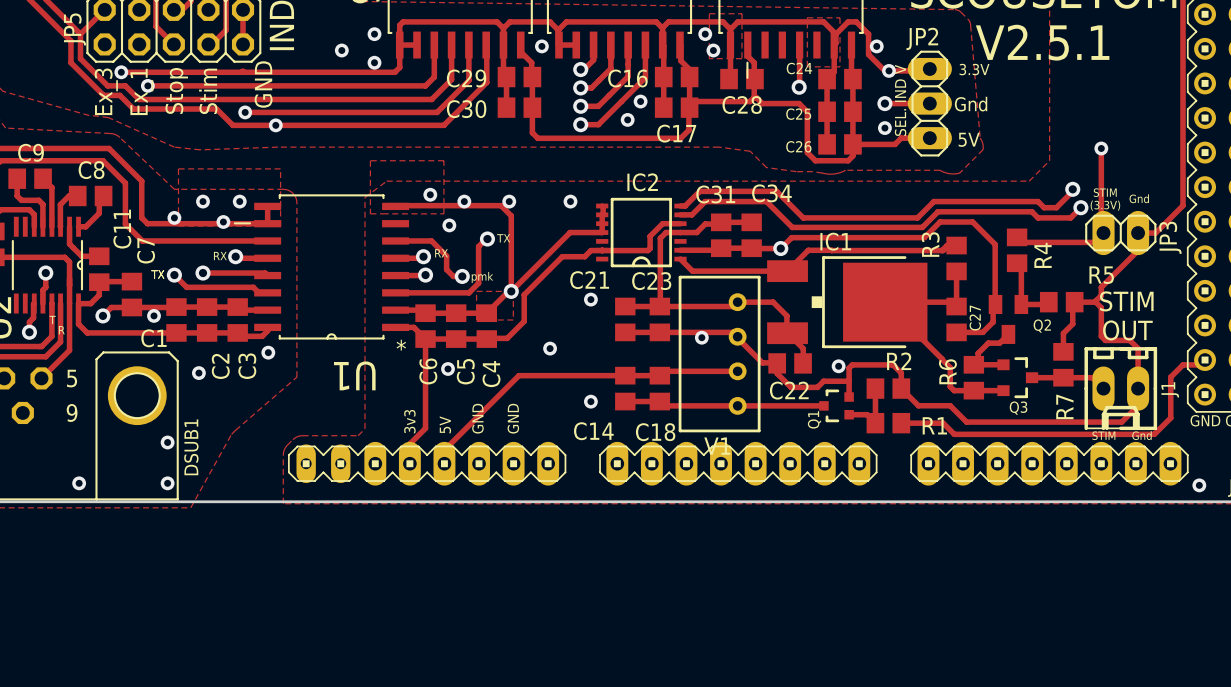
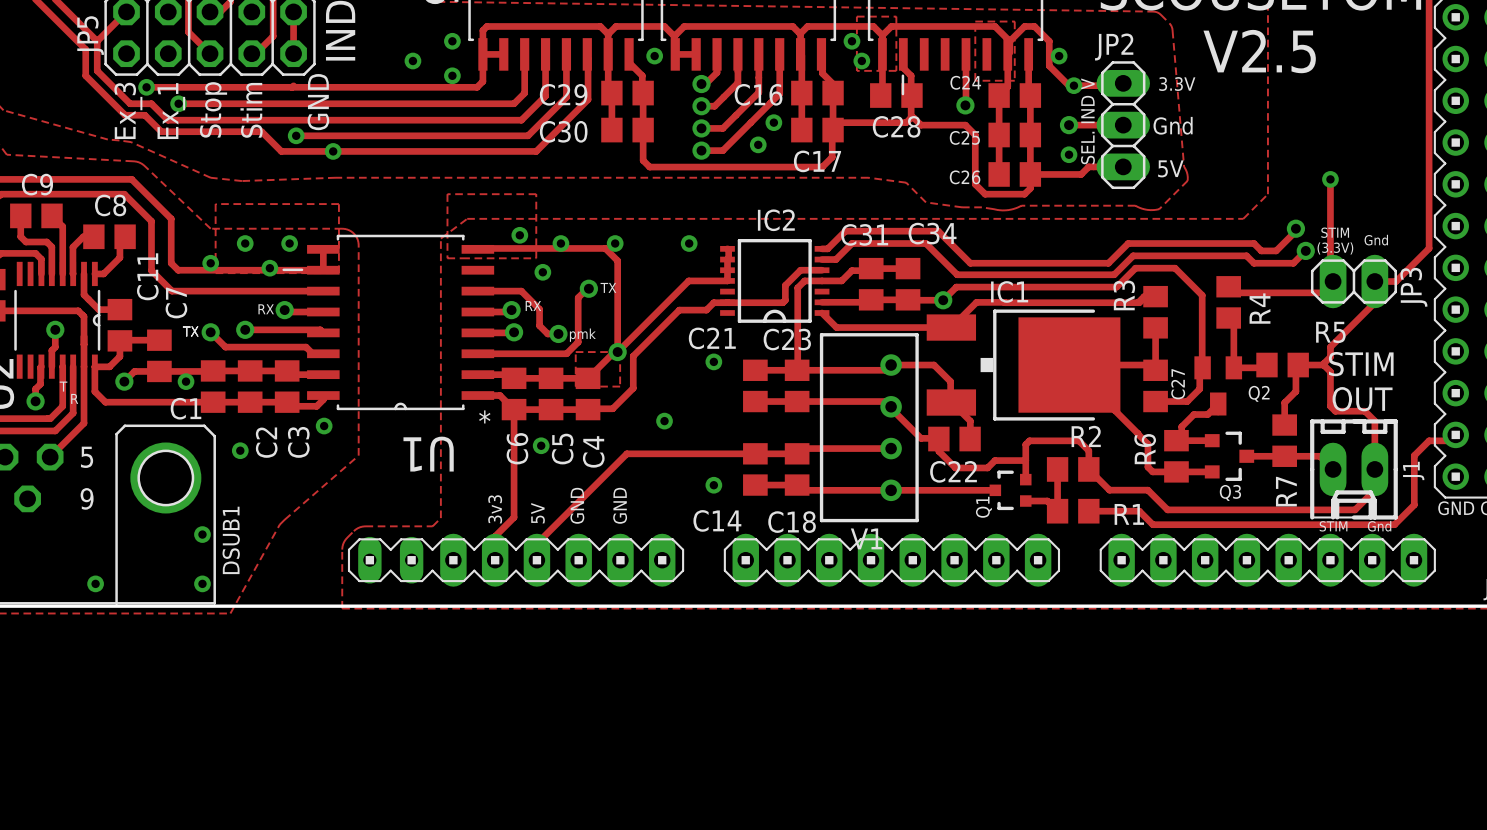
text: V2.5.1 (1042, 42) -> V2.5 (1259, 51)
via: (701, 337) -> none
via: (838, 366) -> none
via: (1199, 485) -> none

